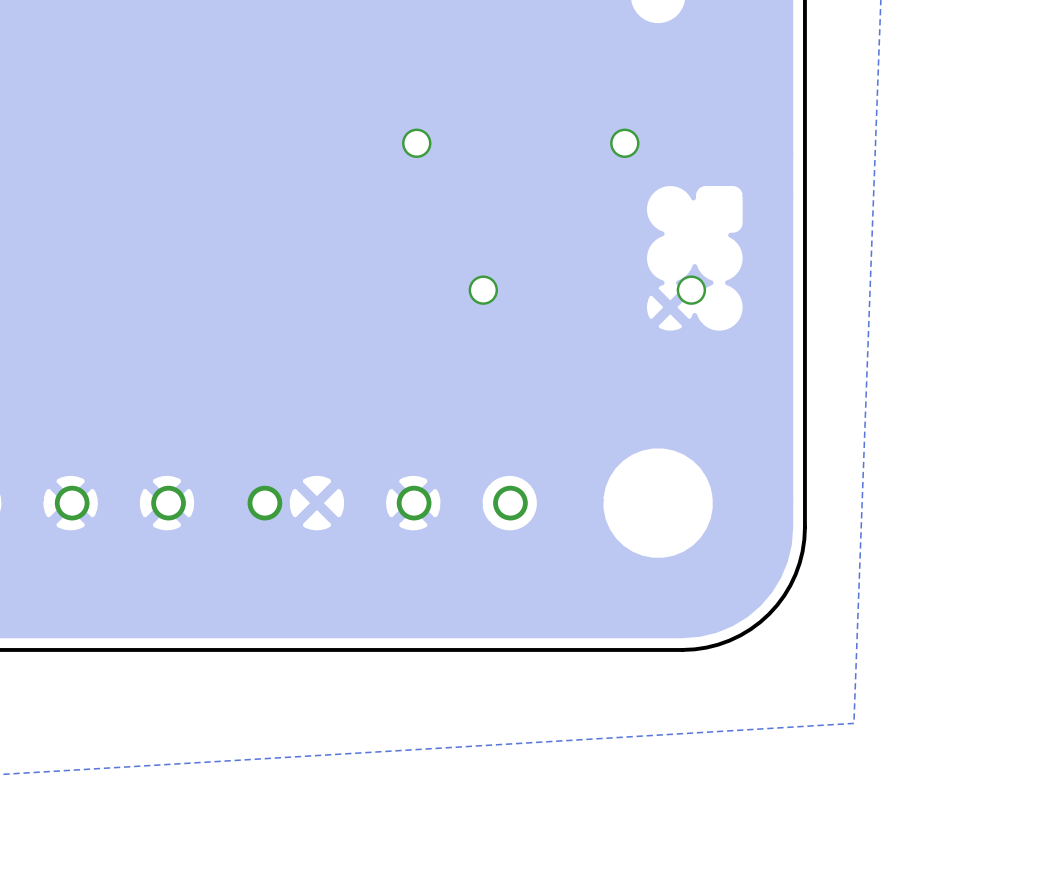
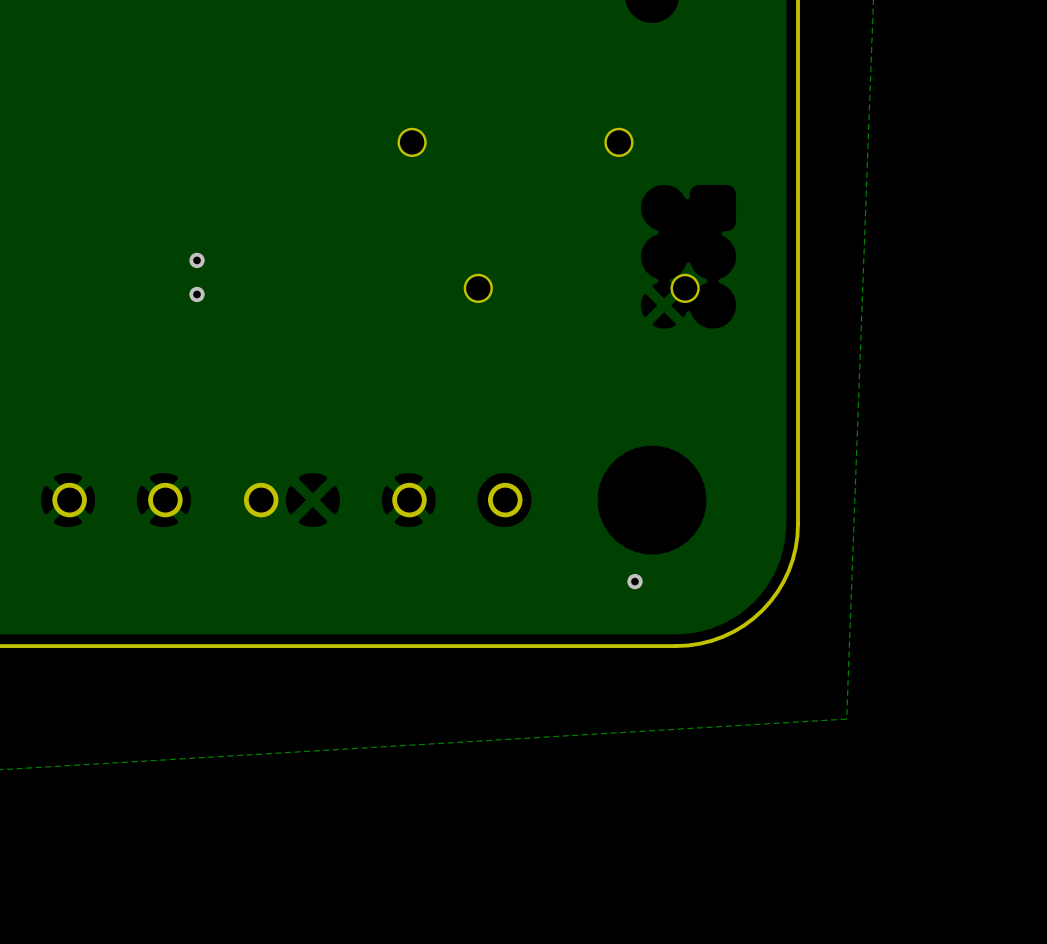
via: none -> (197, 260)
via: none -> (197, 294)
via: none -> (634, 581)

